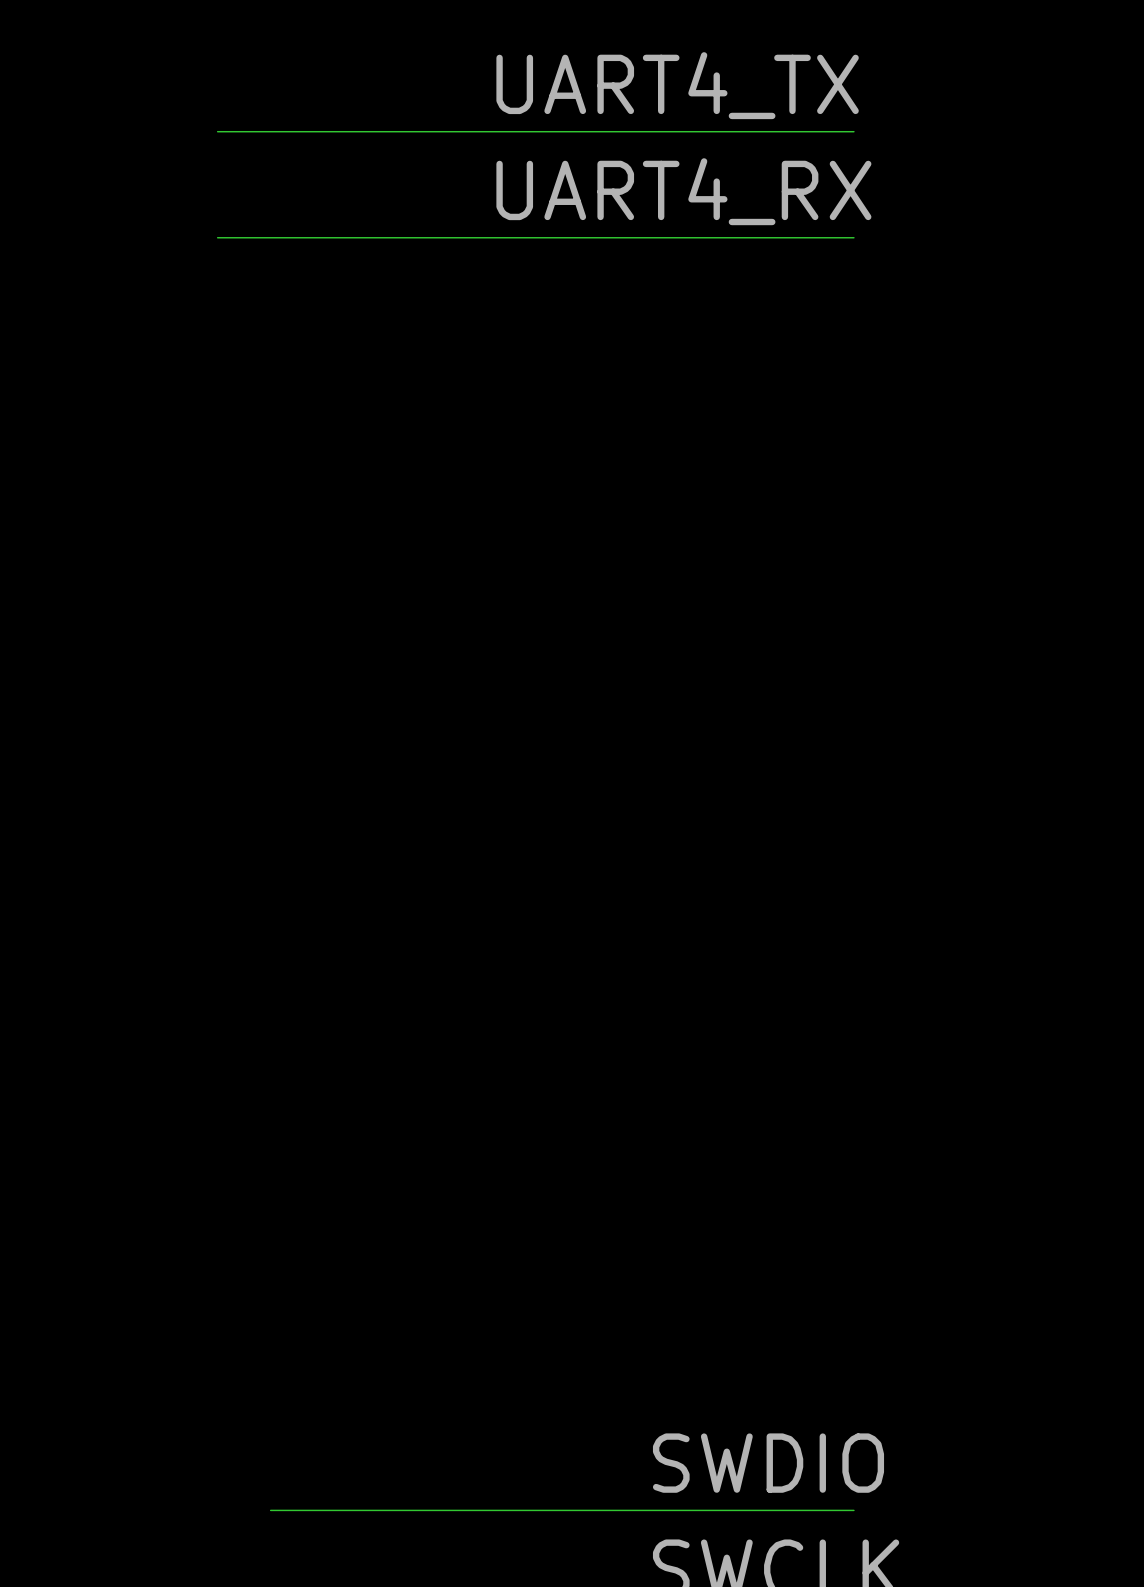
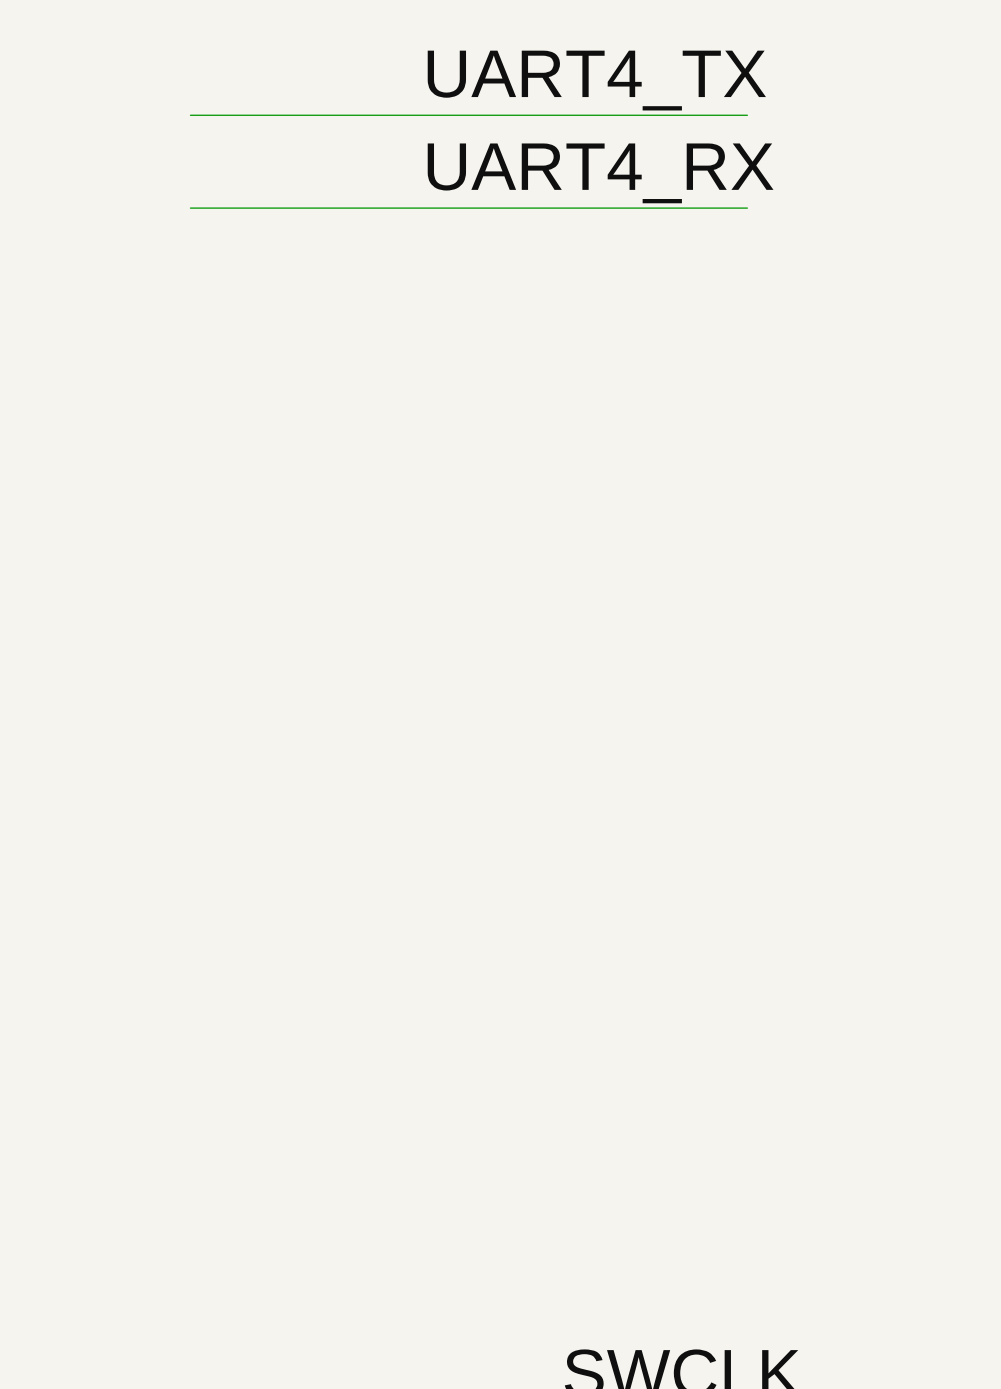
label: SWDIO (768, 1463) -> none
wire: (270, 1510) (853, 1510) -> none

